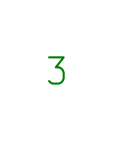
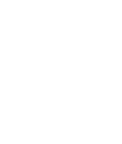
text: 3 (56, 70) -> none

